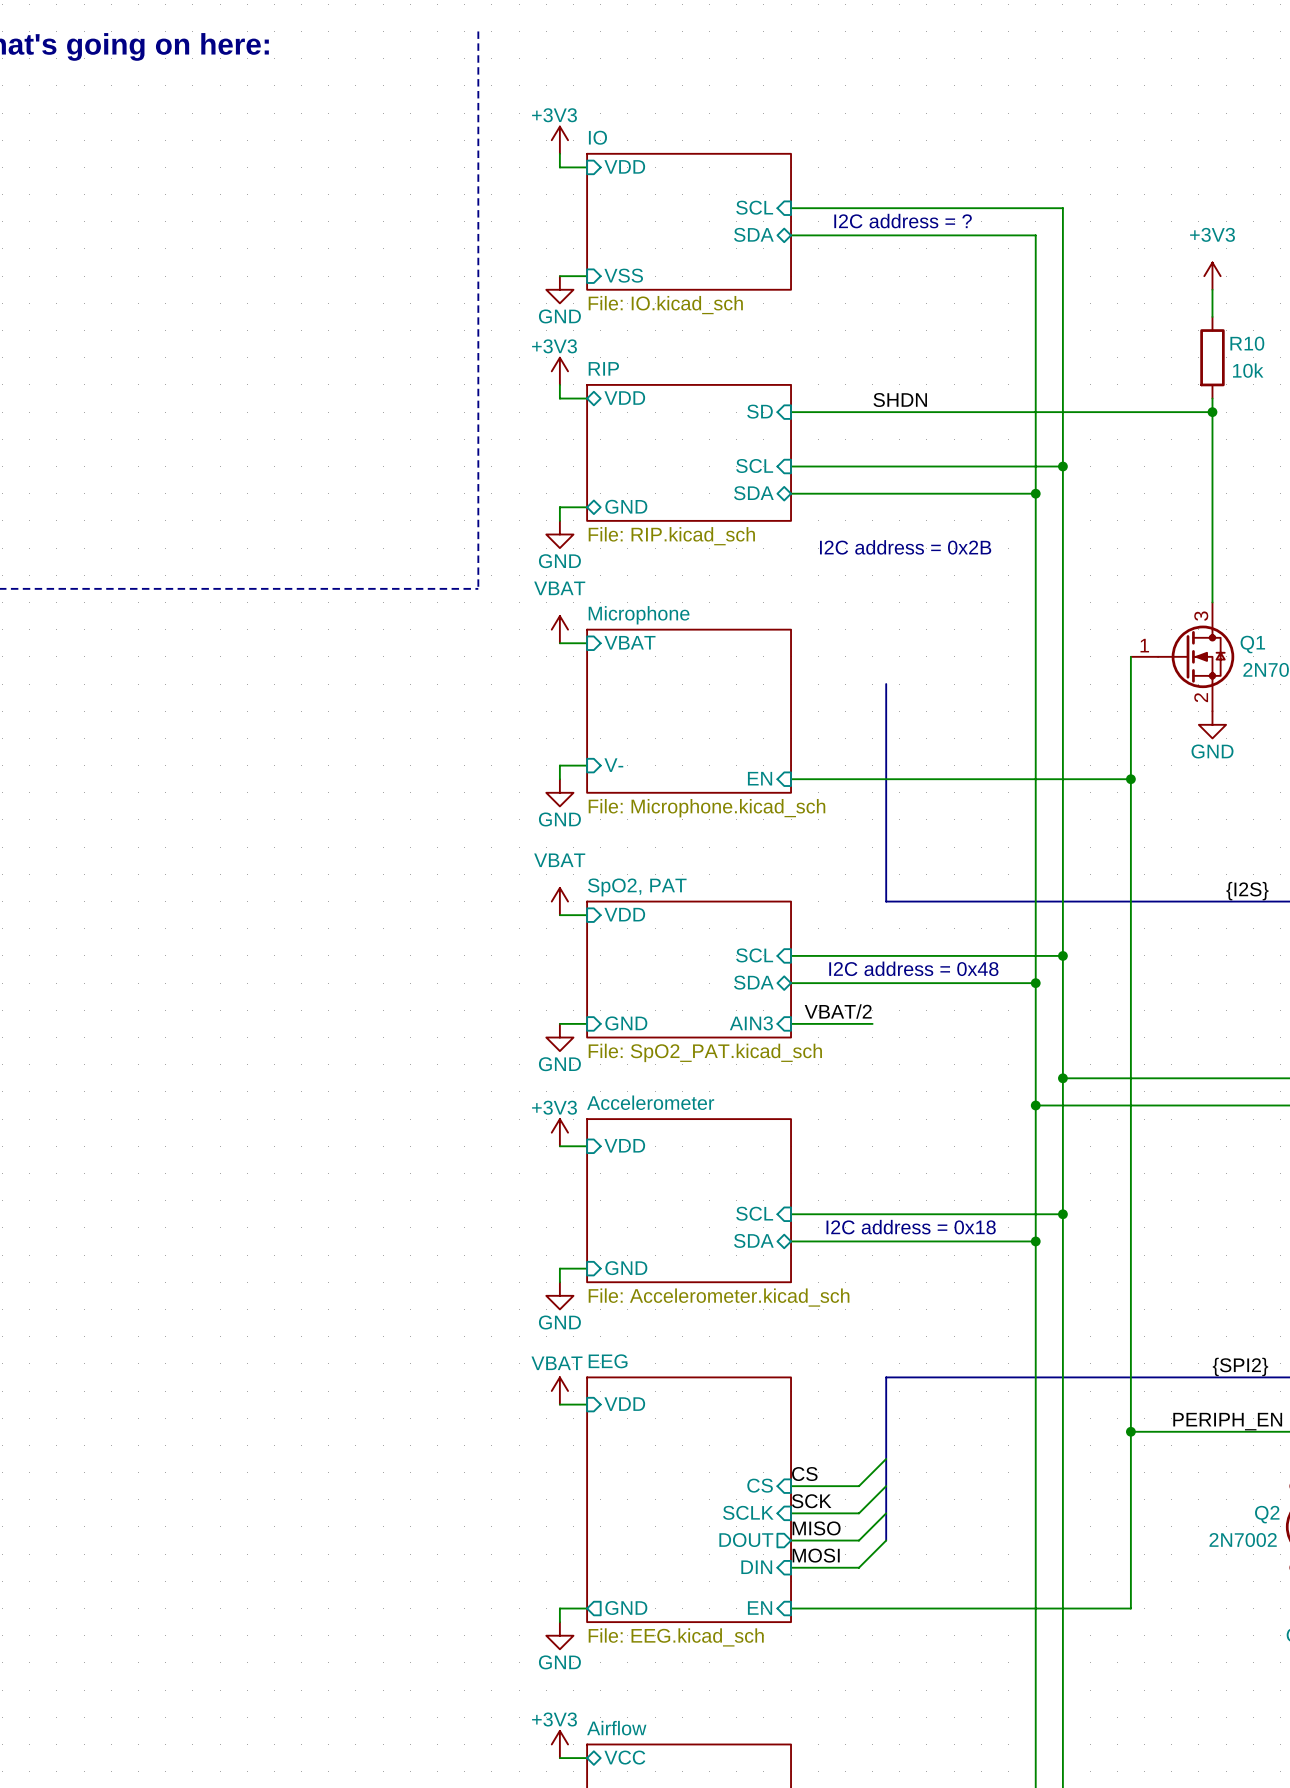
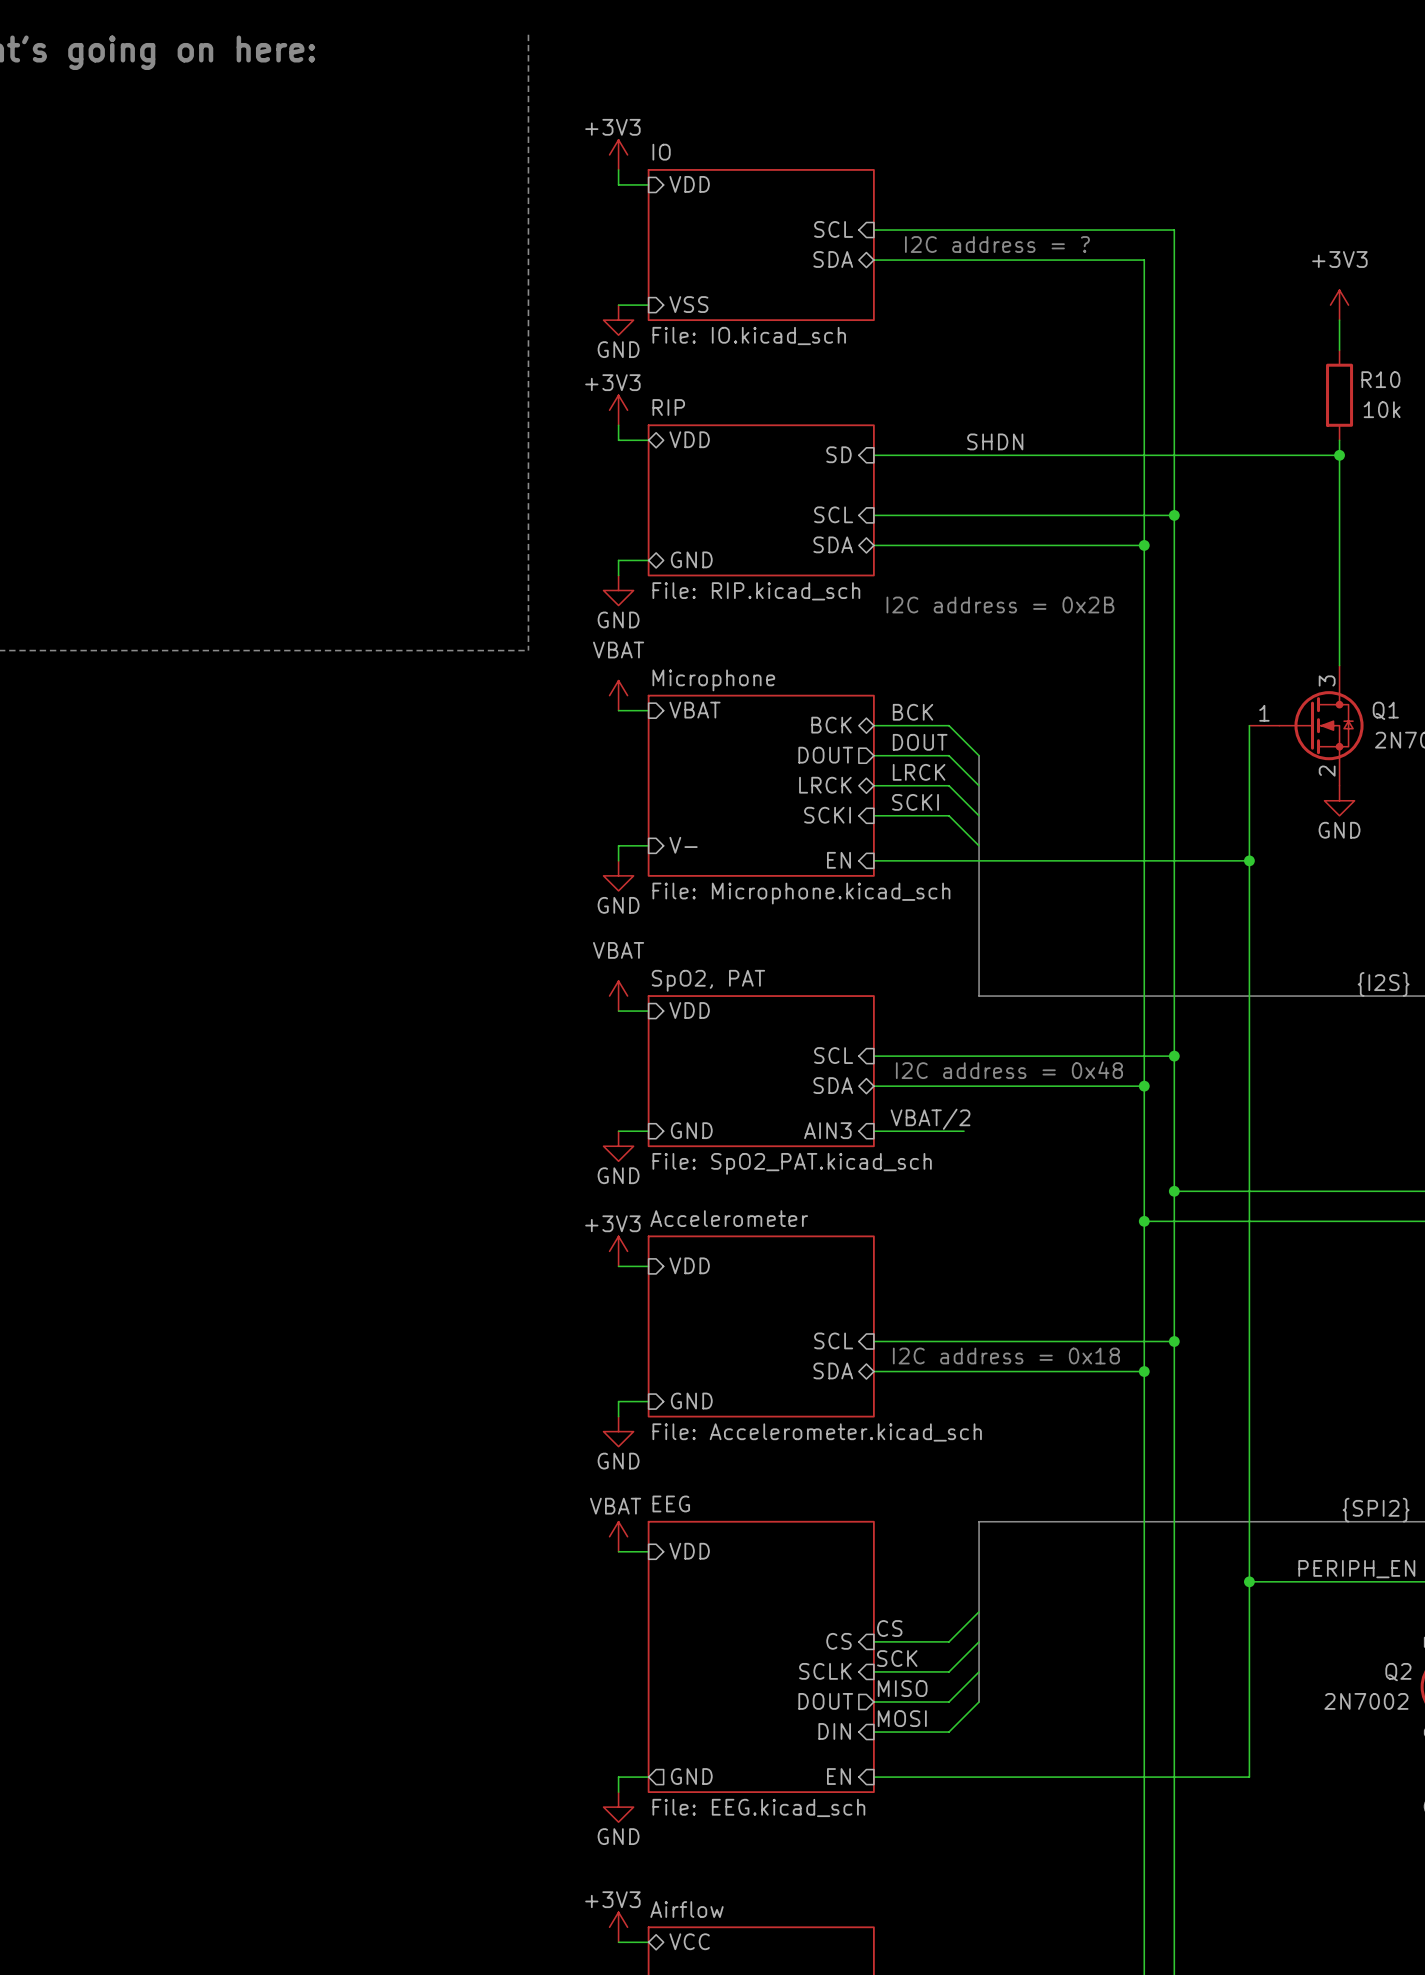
label: none -> BCK (913, 712)
sheet pin: none -> BCK (831, 725)
wire: none -> (873, 725) (949, 725) (979, 755)
label: none -> DOUT (920, 742)
sheet pin: none -> DOUT (825, 755)
wire: none -> (873, 755) (949, 755) (979, 785)
label: none -> LRCK (919, 772)
sheet pin: none -> LRCK (825, 785)
wire: none -> (873, 785) (949, 785) (979, 815)
label: none -> SCKI (915, 802)
sheet pin: none -> SCKI (827, 815)
wire: none -> (873, 815) (949, 815) (979, 845)

